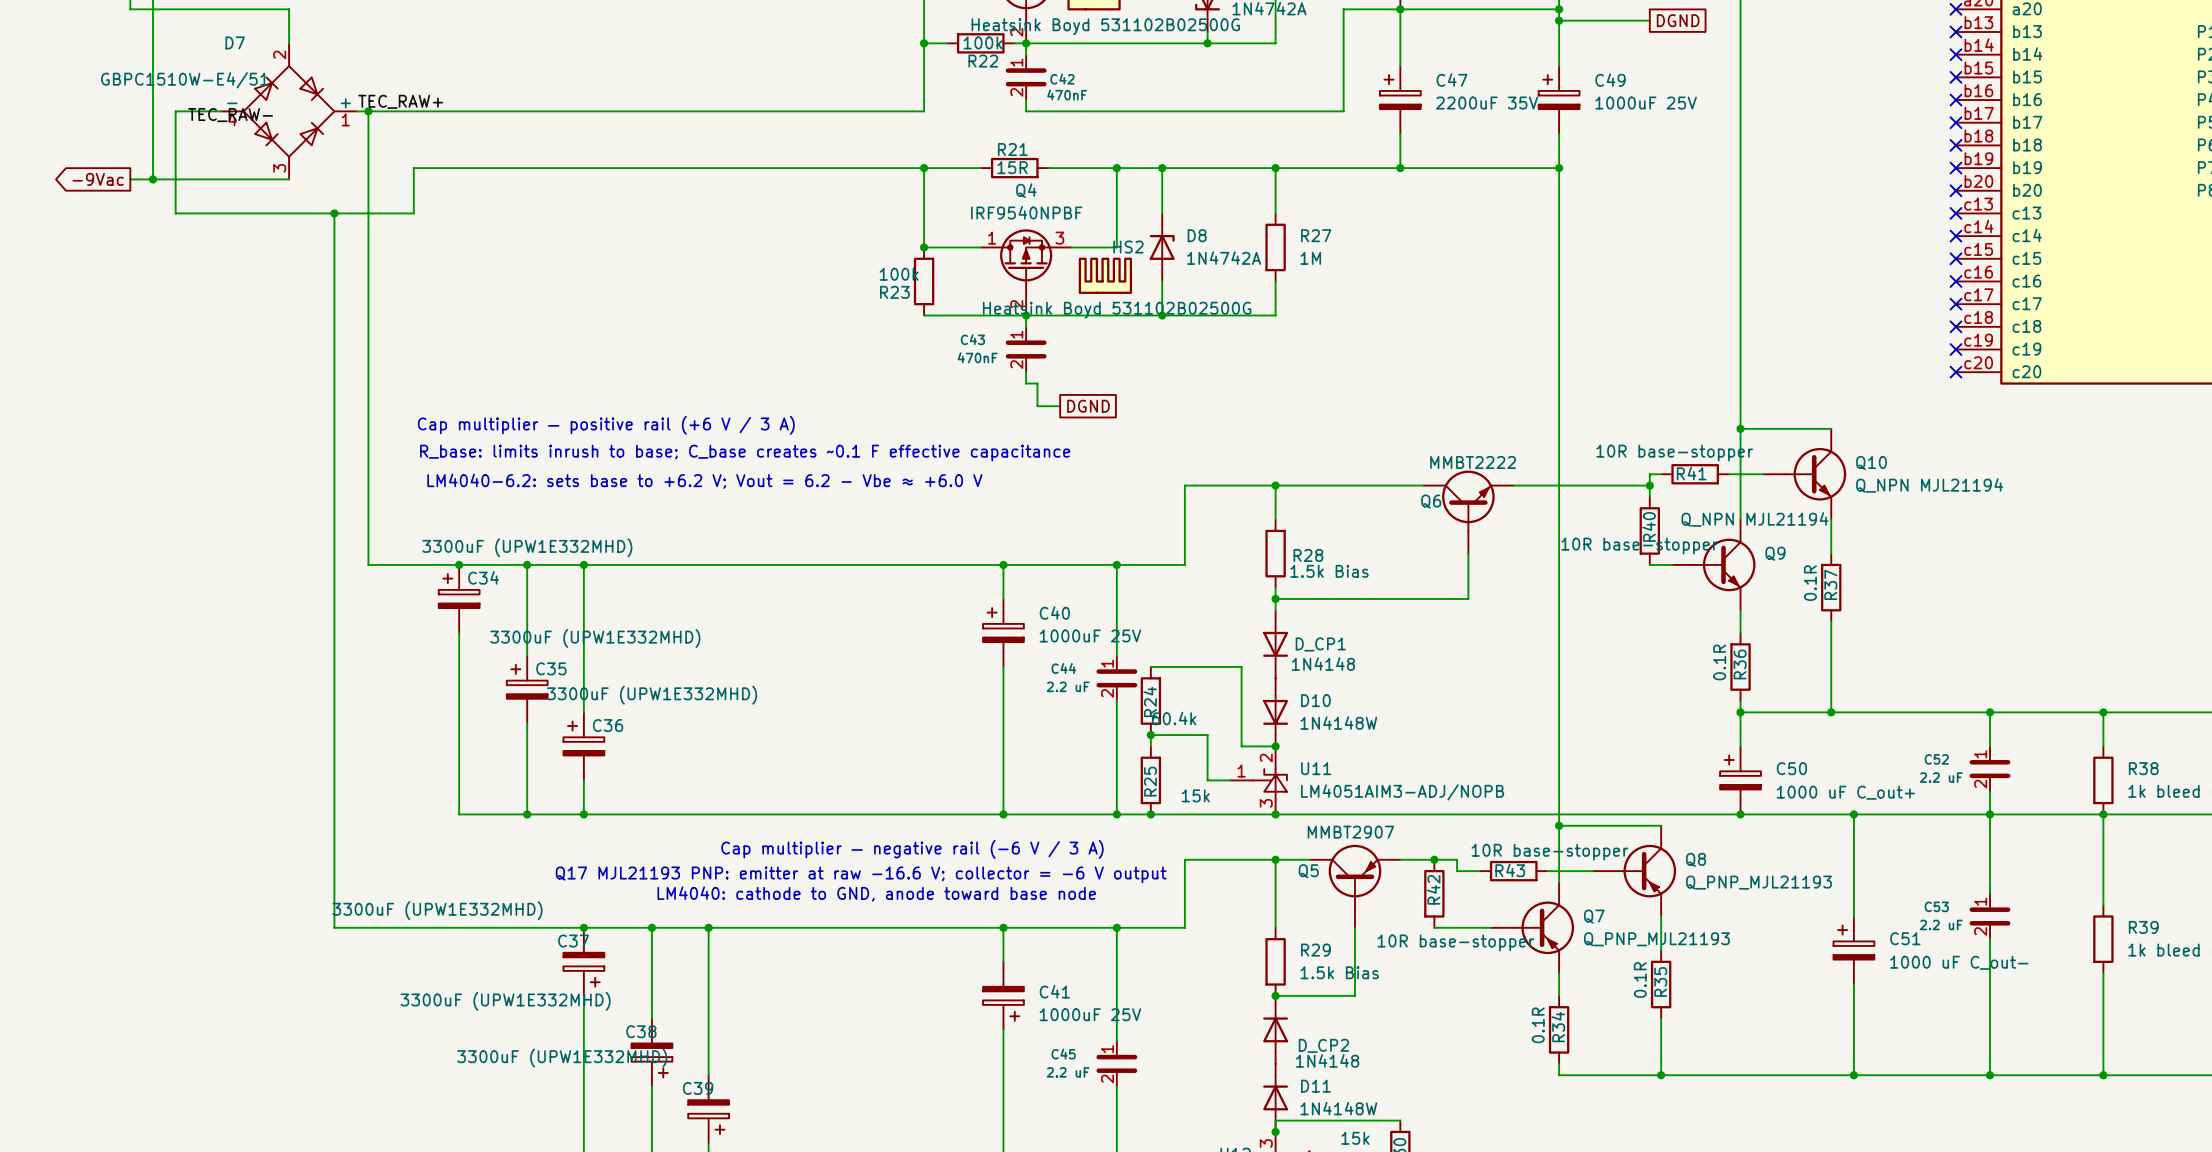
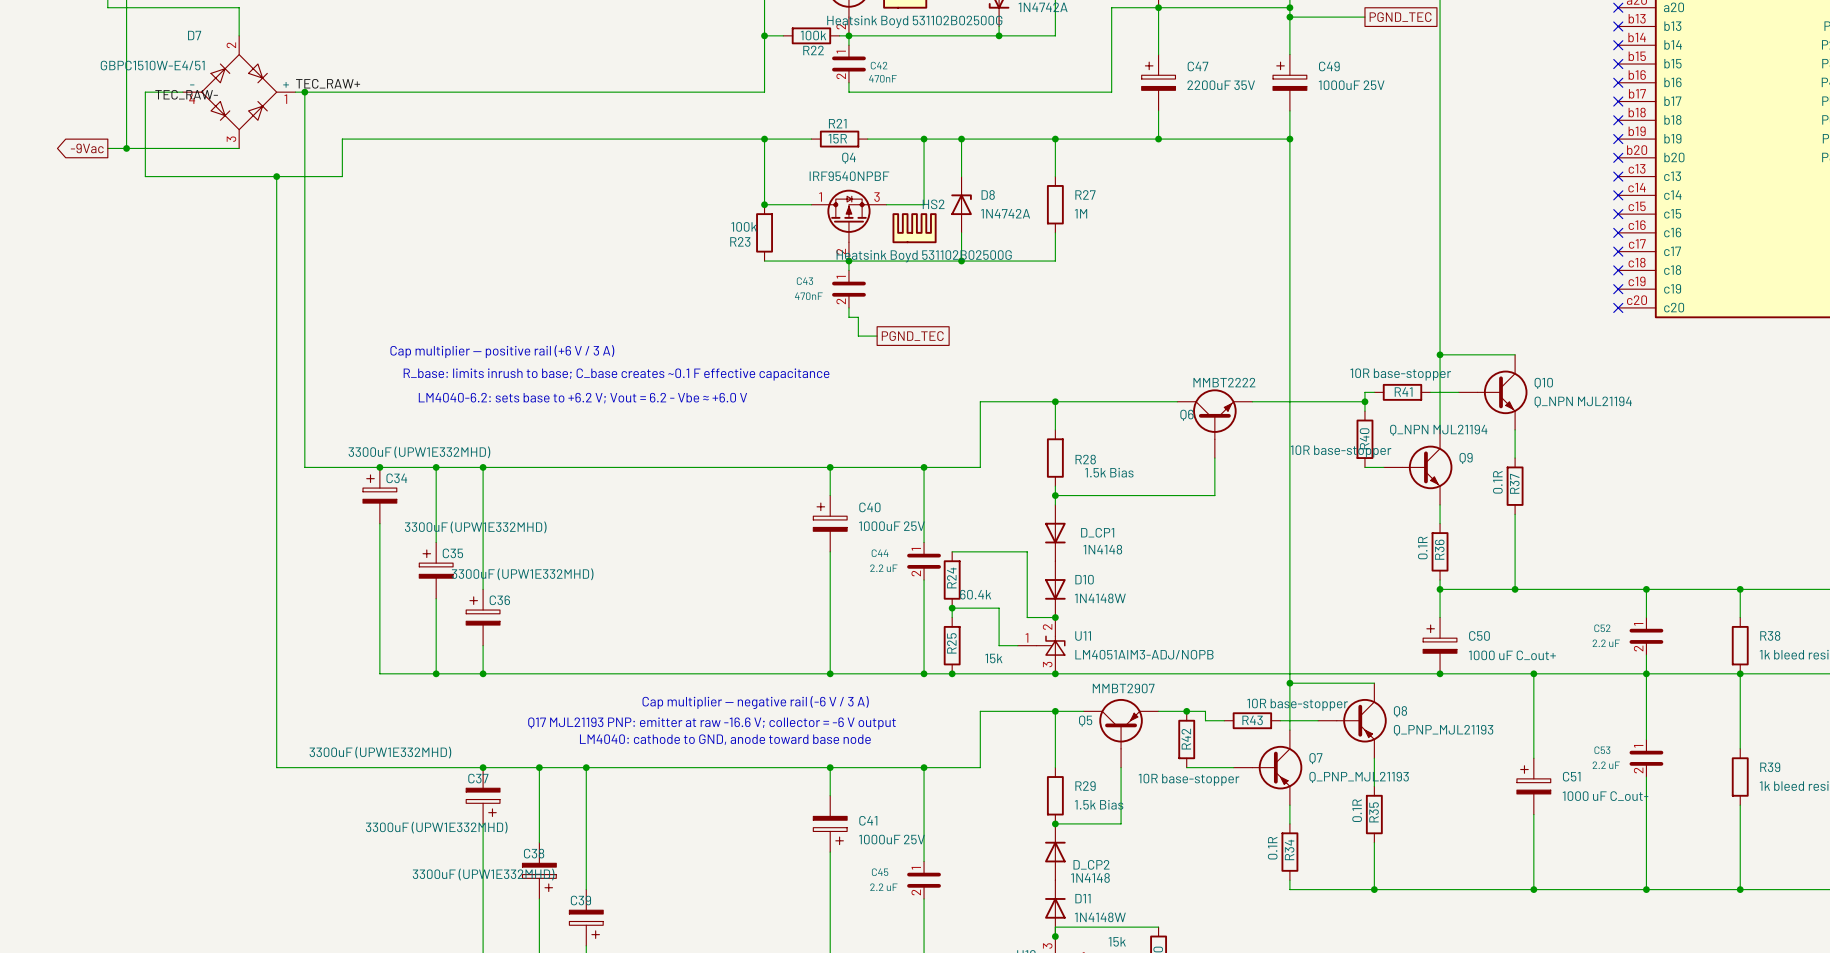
global label: DGND (1678, 20) -> PGND_TEC (1400, 17)
global label: DGND (1088, 406) -> PGND_TEC (912, 336)

